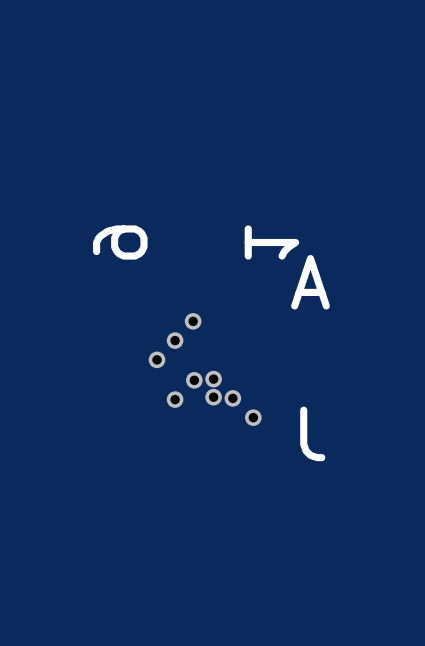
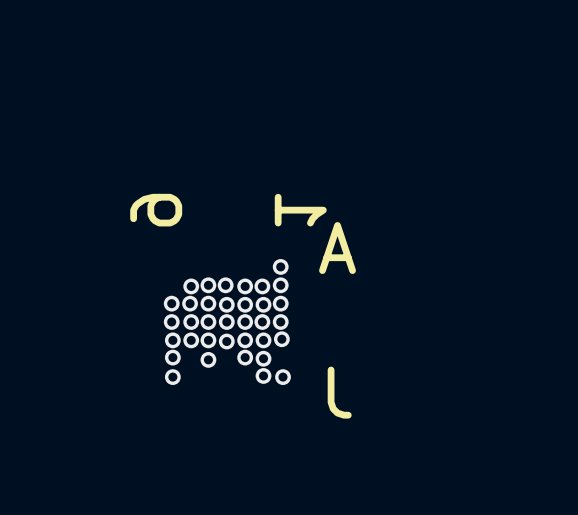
via: none -> (280, 266)
via: none -> (208, 285)
via: none -> (280, 285)
via: none -> (191, 286)
via: none -> (245, 286)
via: none -> (262, 286)
via: none -> (171, 303)
via: none -> (190, 303)
via: none -> (280, 303)
via: none -> (226, 304)
via: none -> (245, 304)
via: none -> (263, 304)
via: none -> (171, 322)
via: none -> (208, 322)
via: none -> (226, 322)
via: none -> (245, 322)
via: none -> (262, 322)
via: none -> (280, 322)
via: none -> (281, 339)
via: none -> (172, 340)
via: none -> (191, 340)
via: none -> (208, 340)
via: none -> (263, 340)
via: none -> (172, 357)
via: none -> (263, 375)
via: none -> (172, 377)

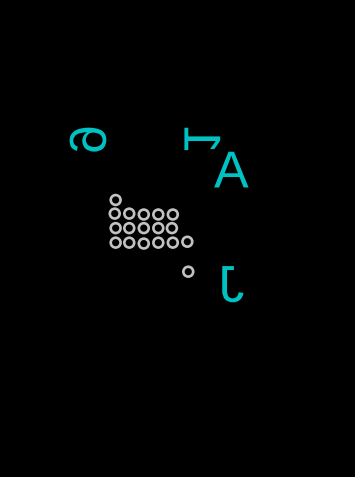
via: (280, 266) -> none
via: (208, 285) -> none
via: (225, 285) -> none
via: (280, 285) -> none
via: (245, 286) -> none
via: (262, 286) -> none
via: (171, 303) -> none
via: (280, 303) -> none
via: (171, 322) -> none
via: (280, 322) -> none
via: (172, 340) -> none
via: (172, 357) -> none
via: (245, 357) -> none
via: (263, 358) -> none
via: (208, 359) -> none
via: (263, 375) -> none
via: (172, 377) -> none

